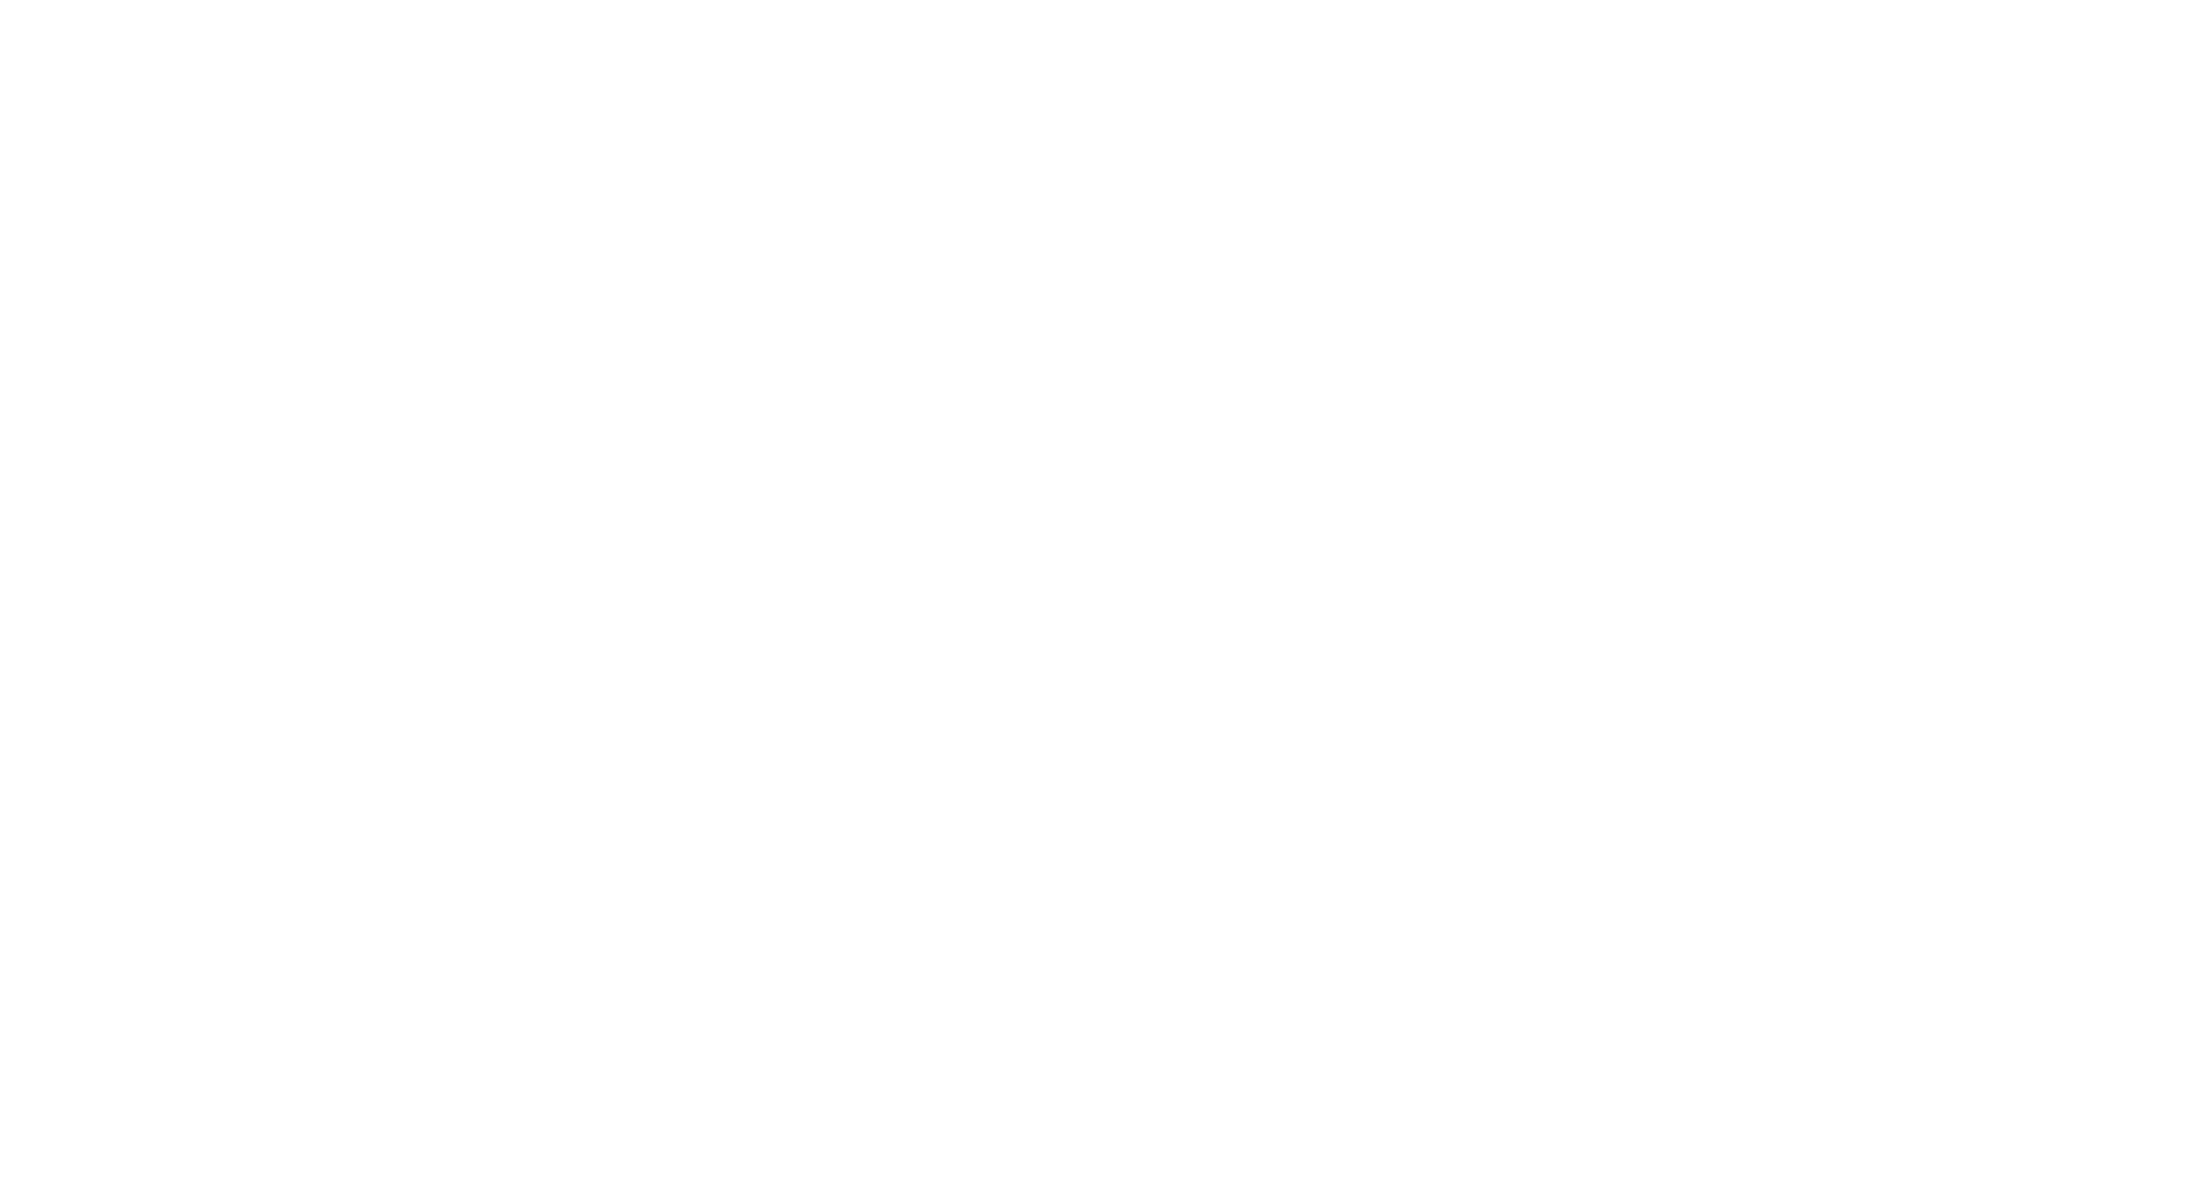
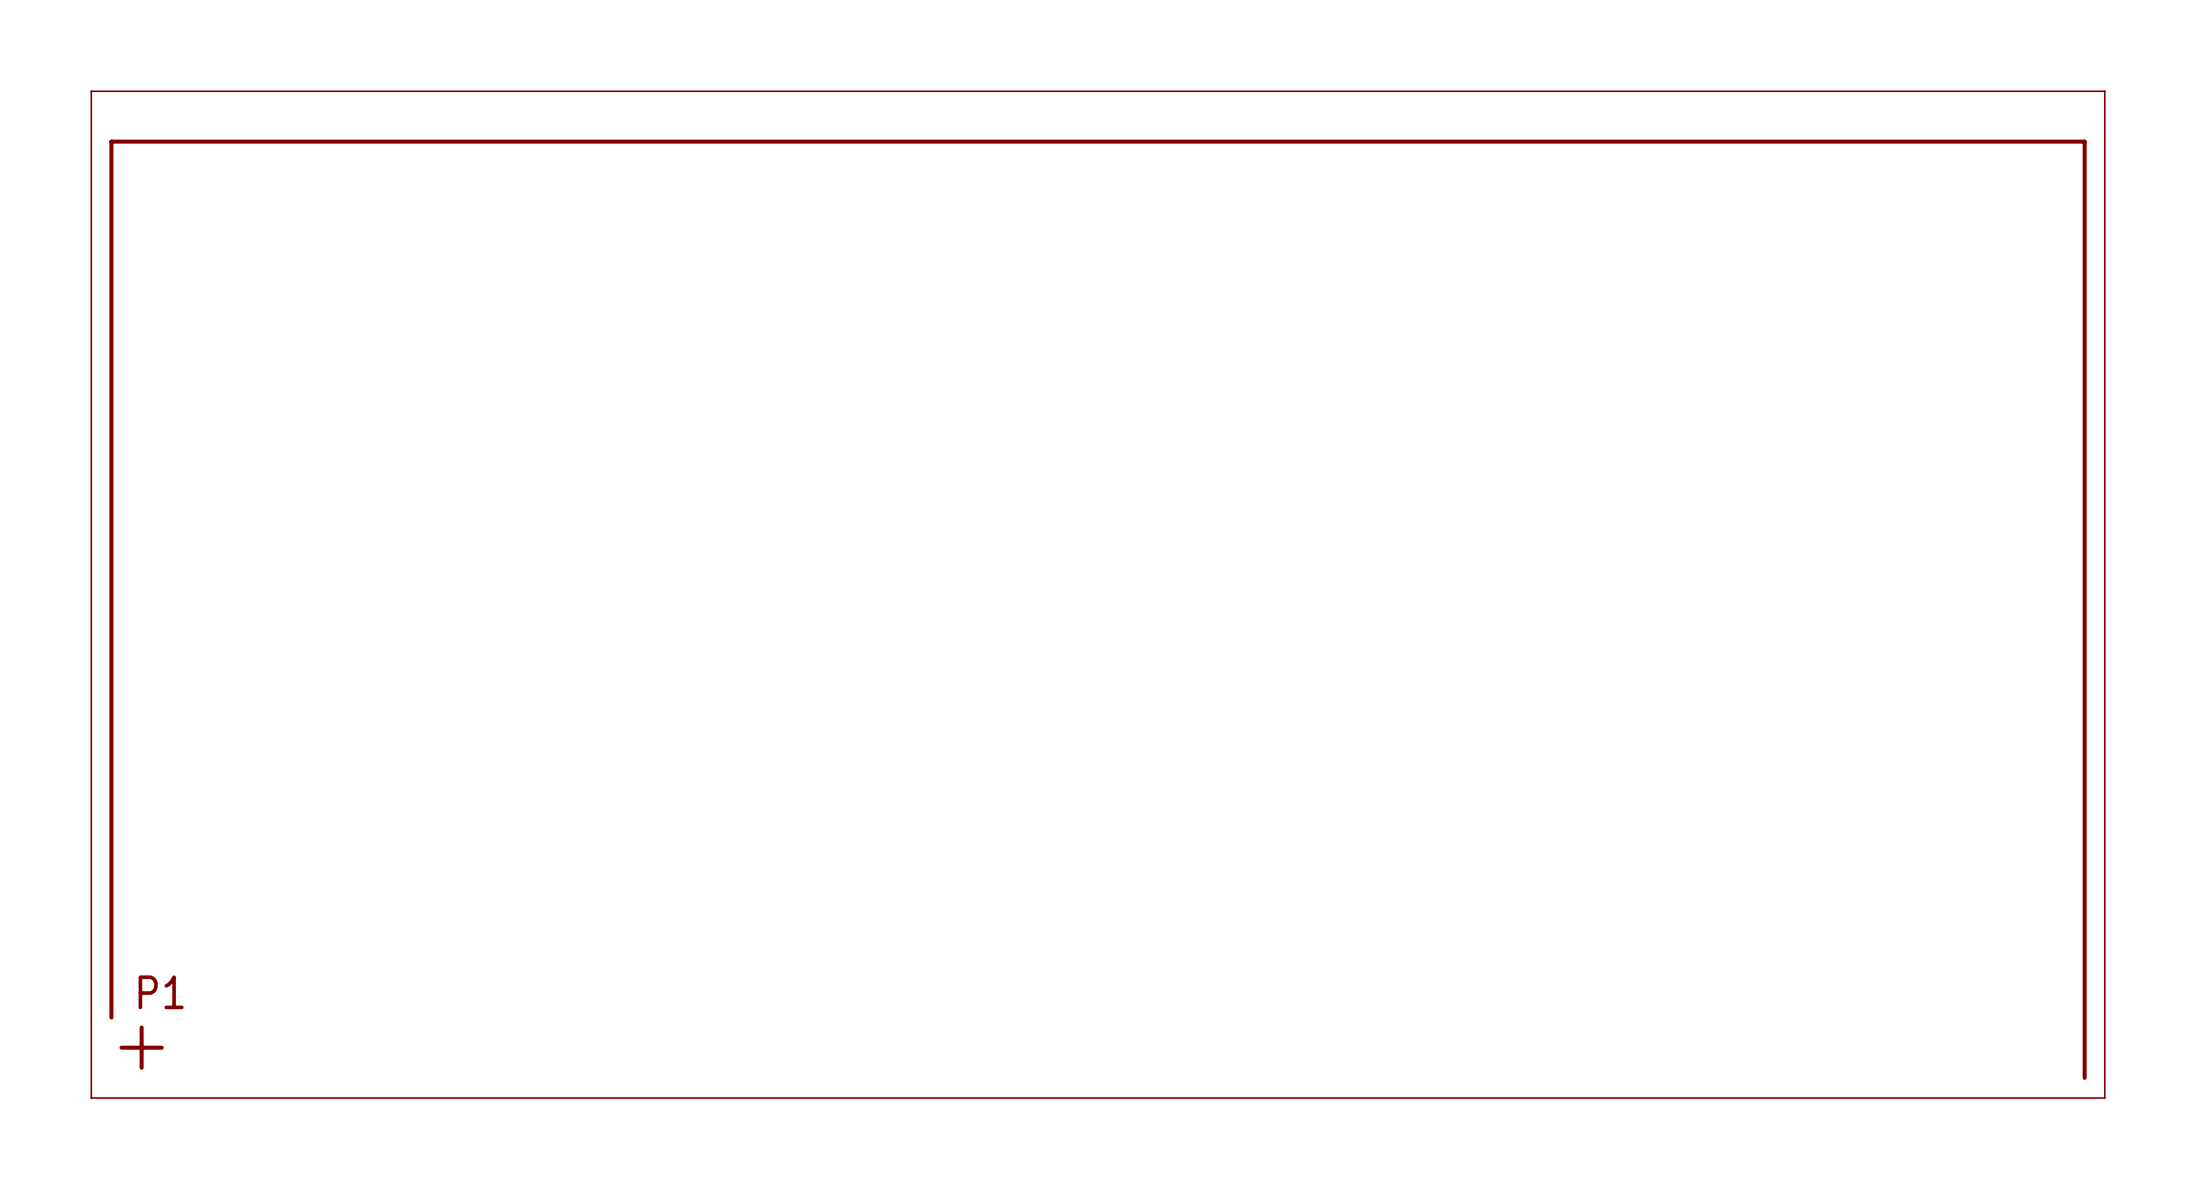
part: none -> (1098, 594)

